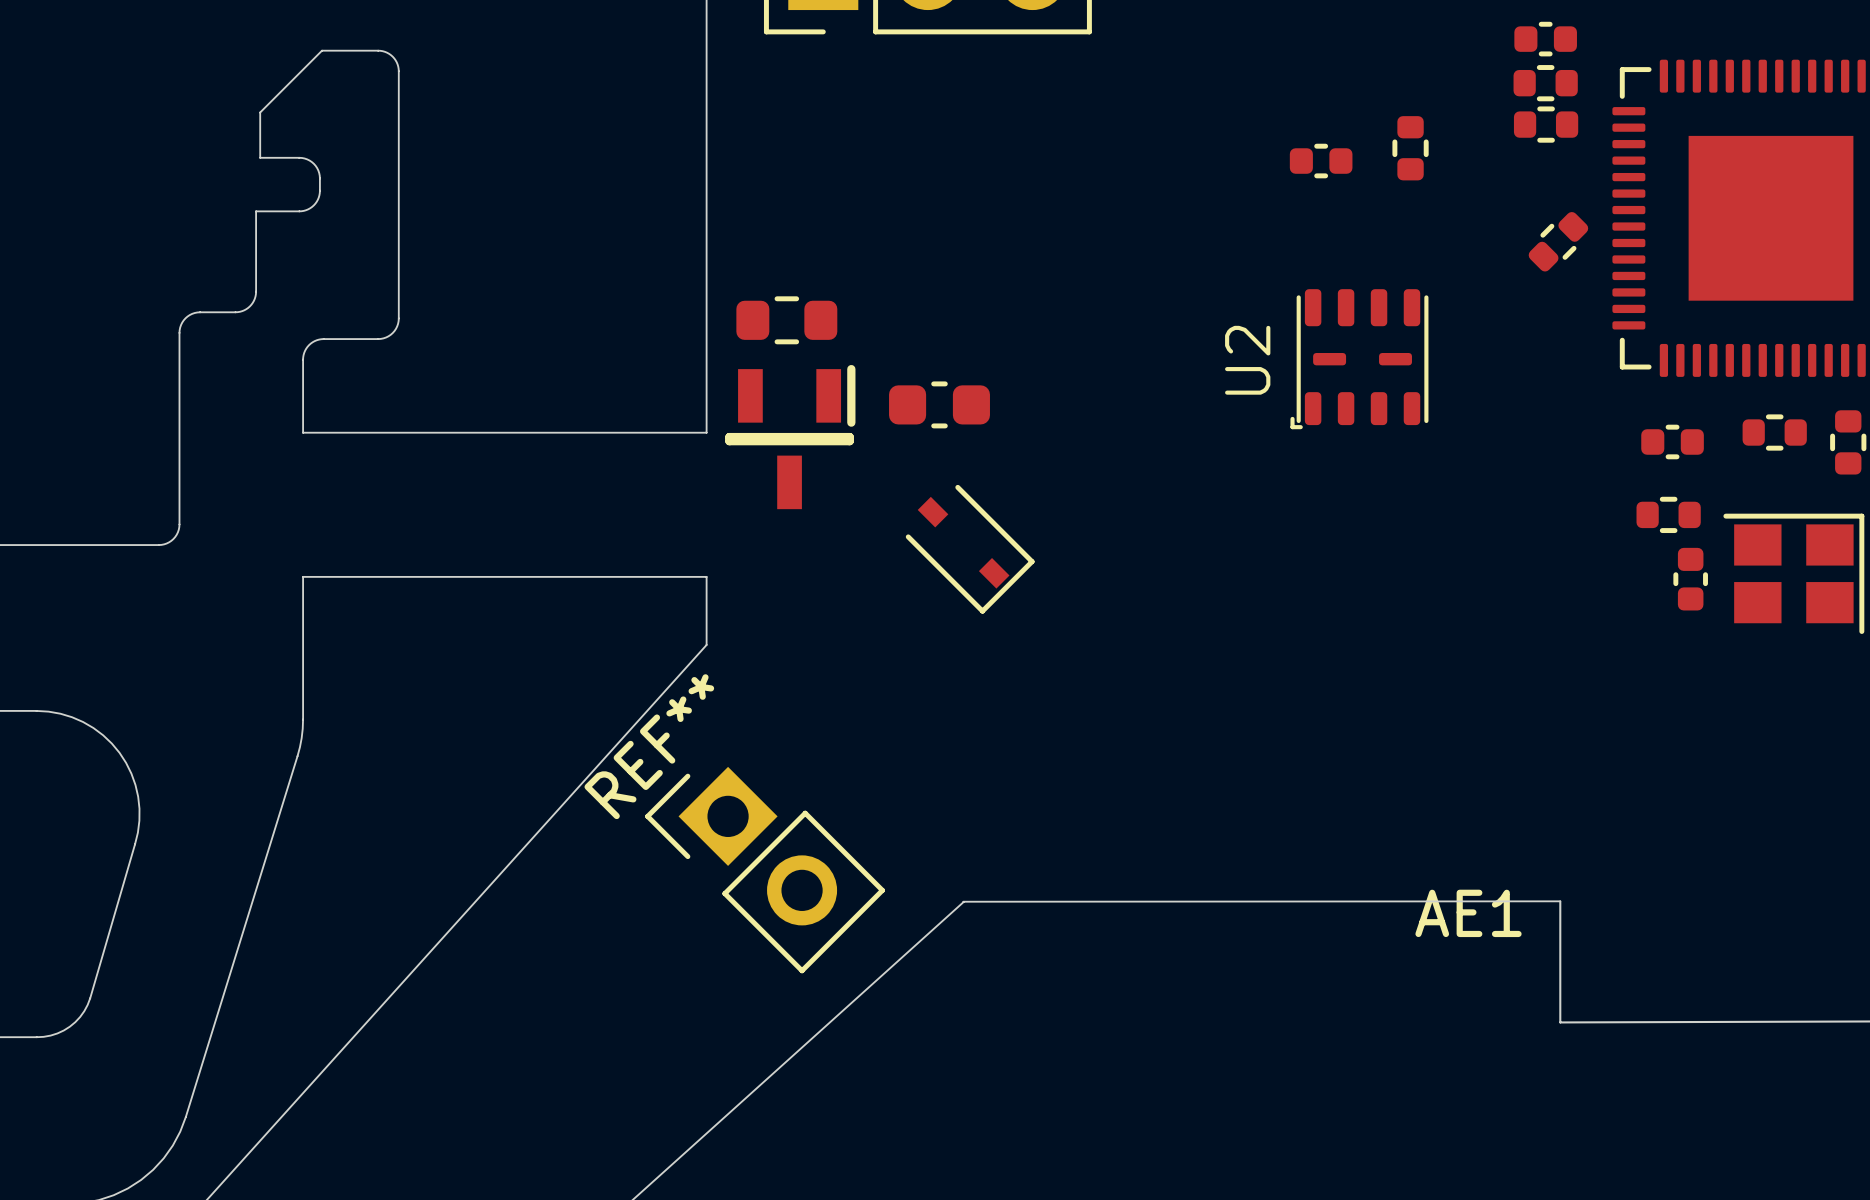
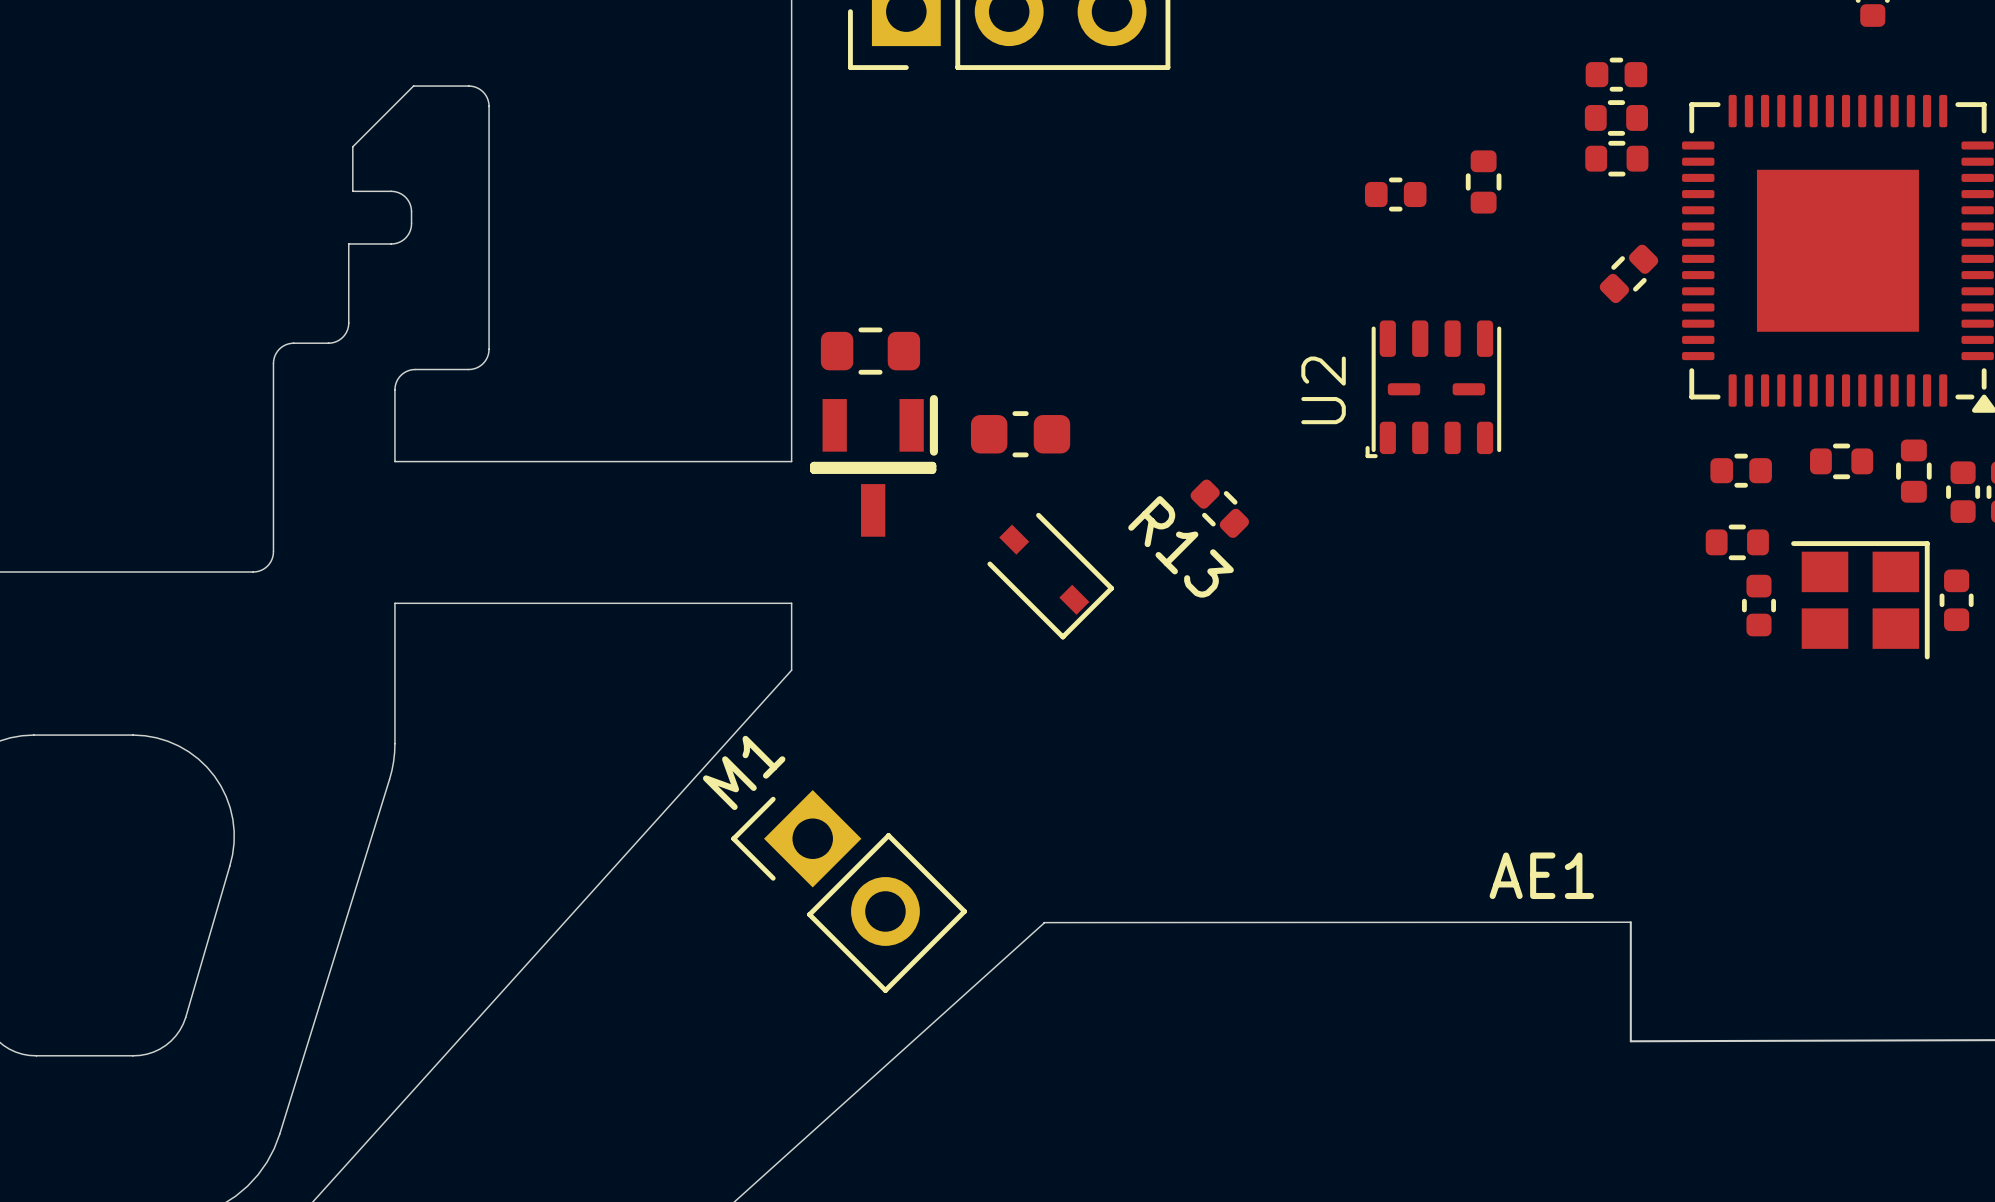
R13: none -> (1219, 508)
REF** name: REF** (649, 746) -> M1 (744, 772)
AE1 name position: AE1 (1468, 913) -> AE1 (1541, 875)

